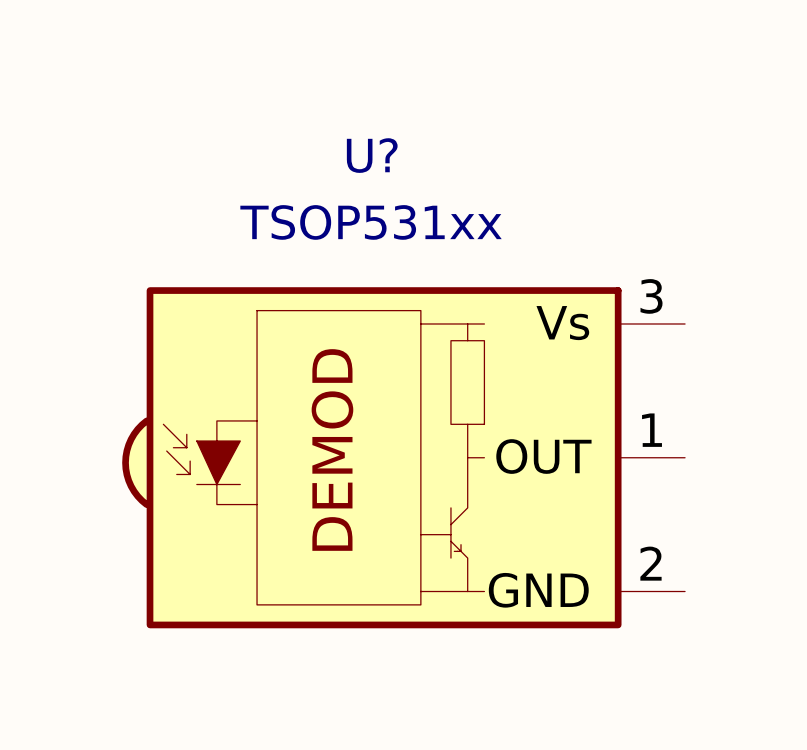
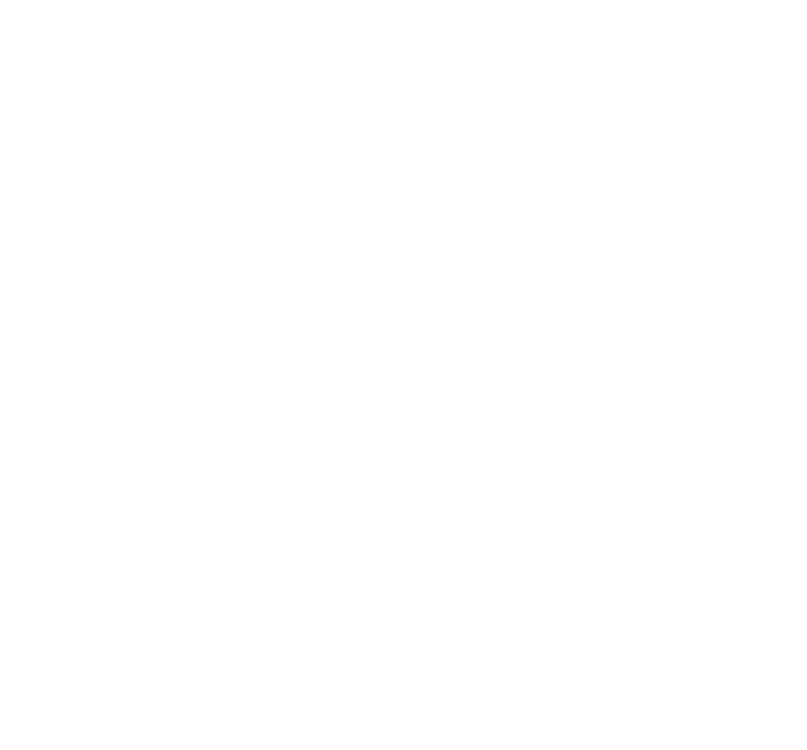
U?: TSOP531xx (403, 457) -> none

